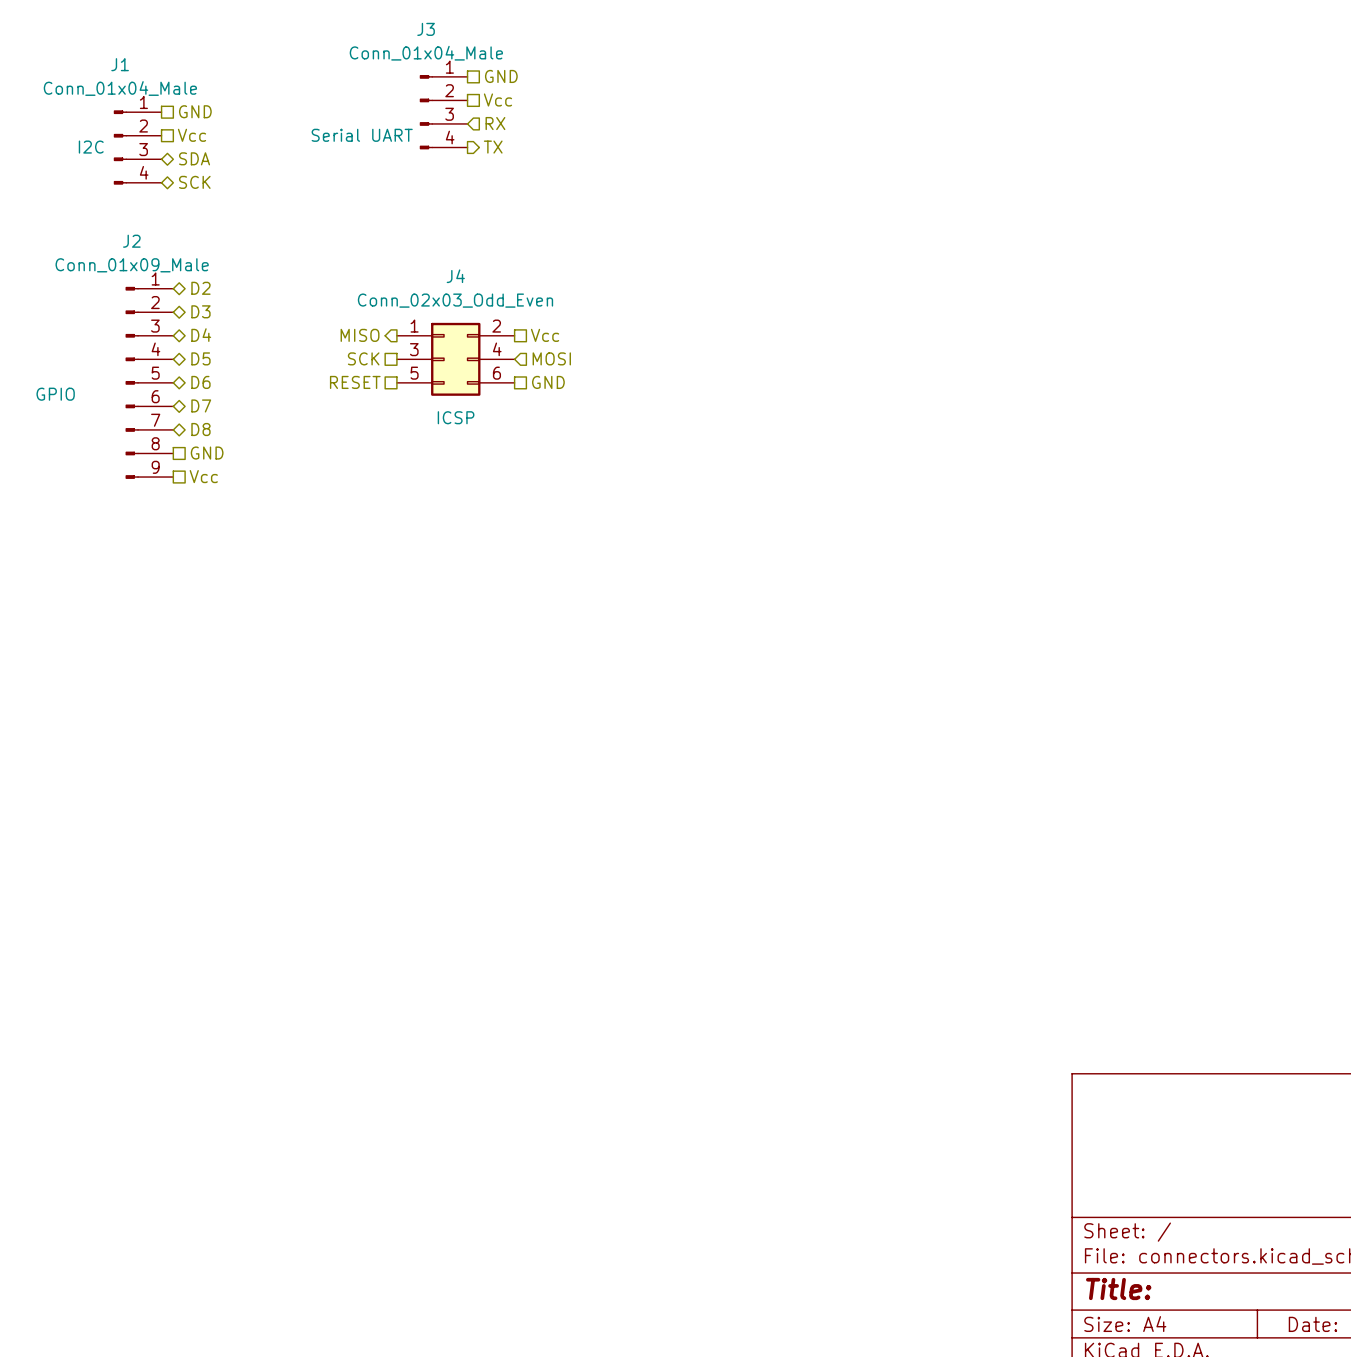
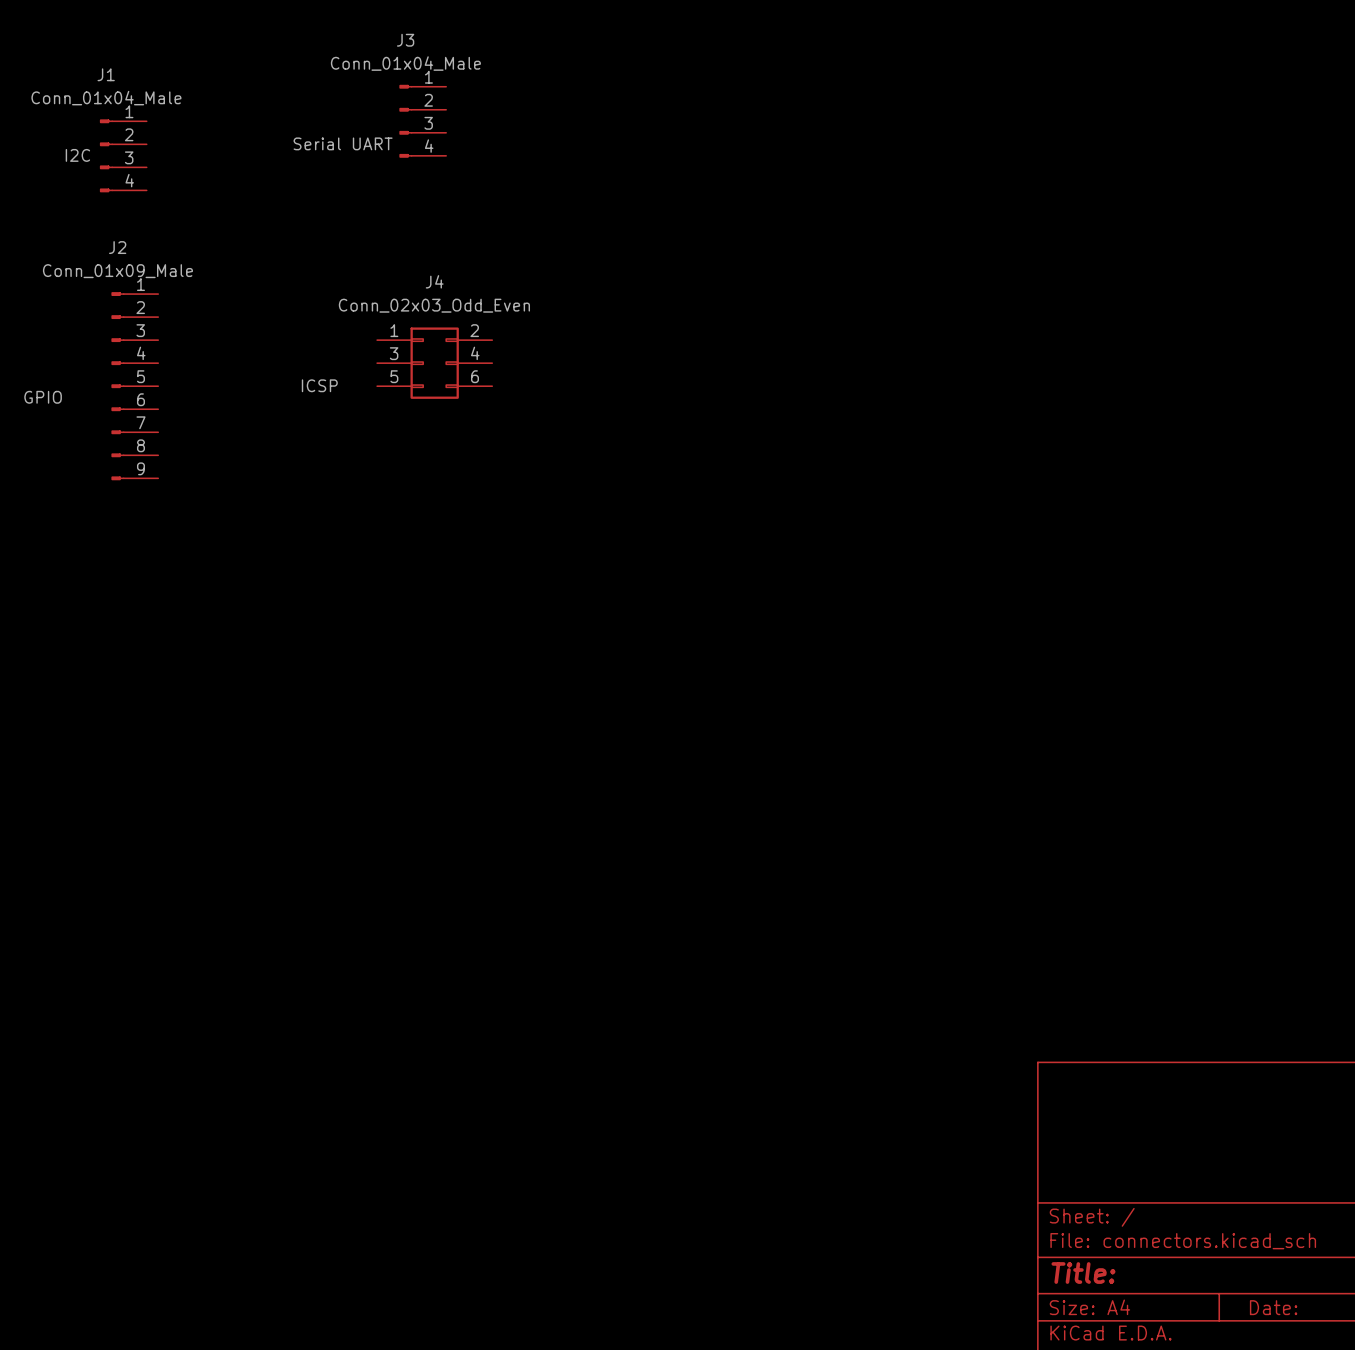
hierarchical label: GND (501, 76) -> none
hierarchical label: Vcc (497, 99) -> none
hierarchical label: GND (195, 111) -> none
hierarchical label: RX (495, 123) -> none
hierarchical label: Vcc (192, 135) -> none
hierarchical label: TX (493, 147) -> none
hierarchical label: SDA (194, 158) -> none
hierarchical label: SCK (194, 182) -> none
hierarchical label: D2 (200, 288) -> none
hierarchical label: D3 (200, 311) -> none
hierarchical label: D4 (201, 335) -> none
hierarchical label: MISO (360, 335) -> none
hierarchical label: Vcc (545, 335) -> none
hierarchical label: D5 (200, 358) -> none
hierarchical label: SCK (363, 358) -> none
hierarchical label: MOSI (551, 358) -> none
hierarchical label: D6 (200, 382) -> none
hierarchical label: RESET (355, 382) -> none
hierarchical label: GND (548, 382) -> none
hierarchical label: D7 (201, 405) -> none
J4 text position: ICSP (456, 417) -> ICSP (319, 385)
hierarchical label: D8 (200, 429) -> none
hierarchical label: GND (207, 453) -> none
hierarchical label: Vcc (203, 476) -> none

